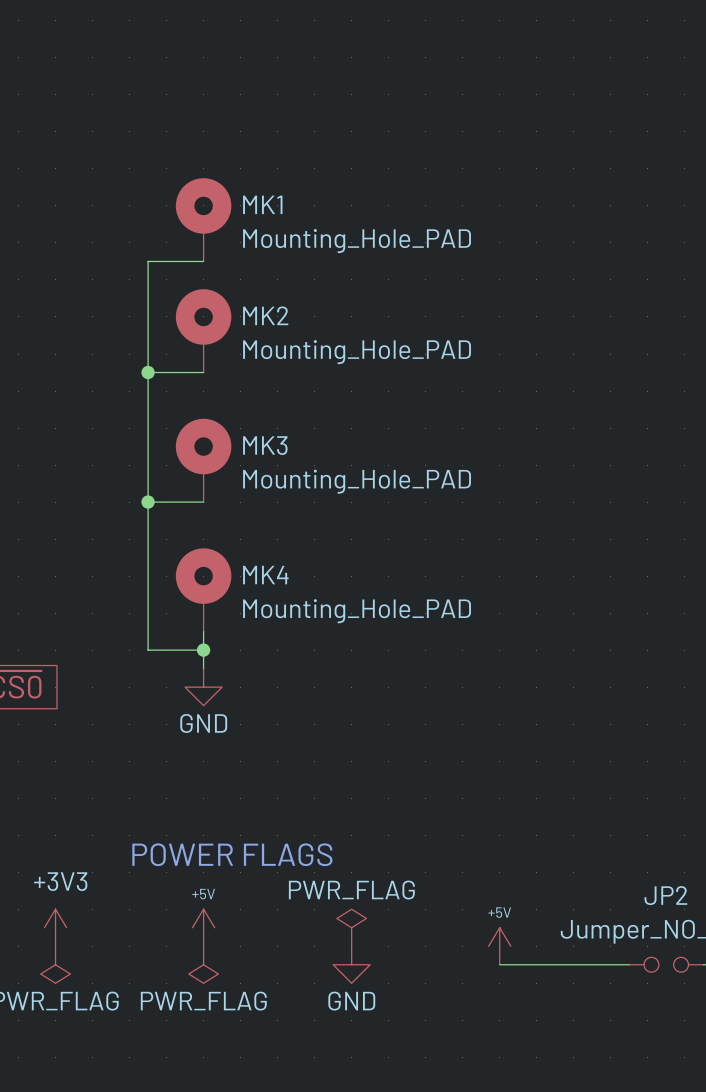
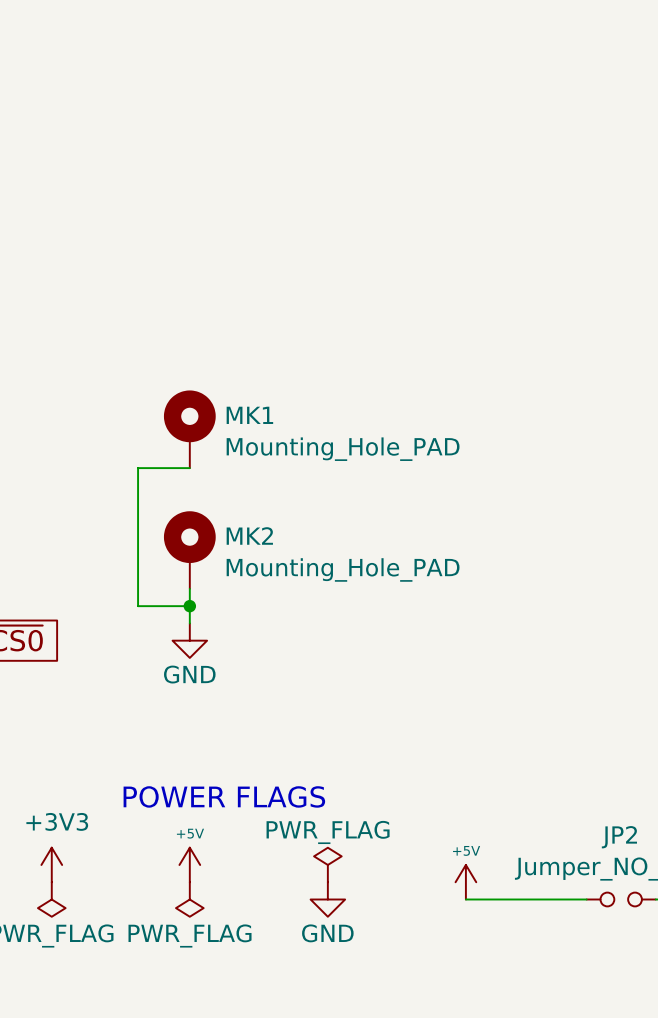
MK1: Mounting_Hole_PAD (203, 219) -> none
wire: (203, 261) (148, 261) (148, 502) -> none
MK2: Mounting_Hole_PAD (203, 330) -> none
wire: (148, 372) (203, 372) -> none
junction: (148, 372) -> none
MK3 name: MK3 (265, 445) -> MK1 (249, 415)
junction: (148, 502) -> none
MK4 name: MK4 (265, 575) -> MK2 (249, 535)

